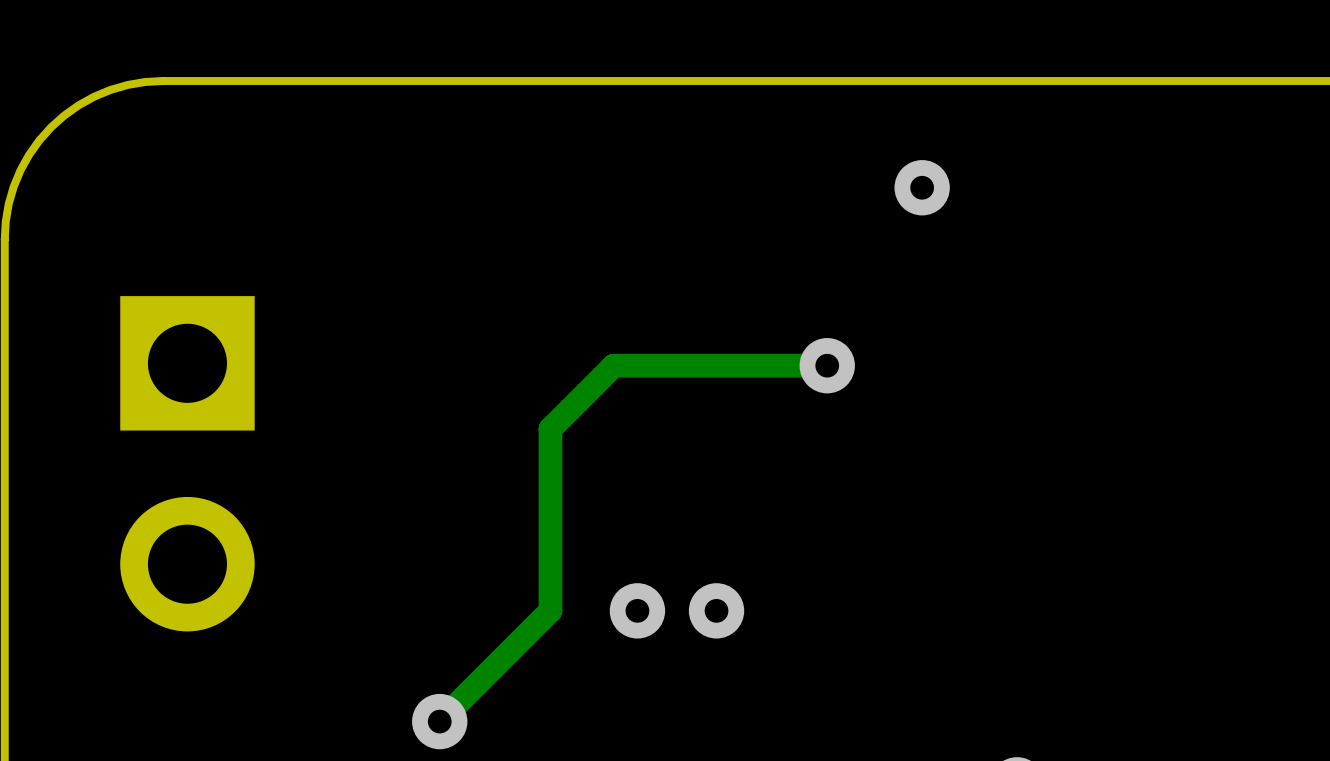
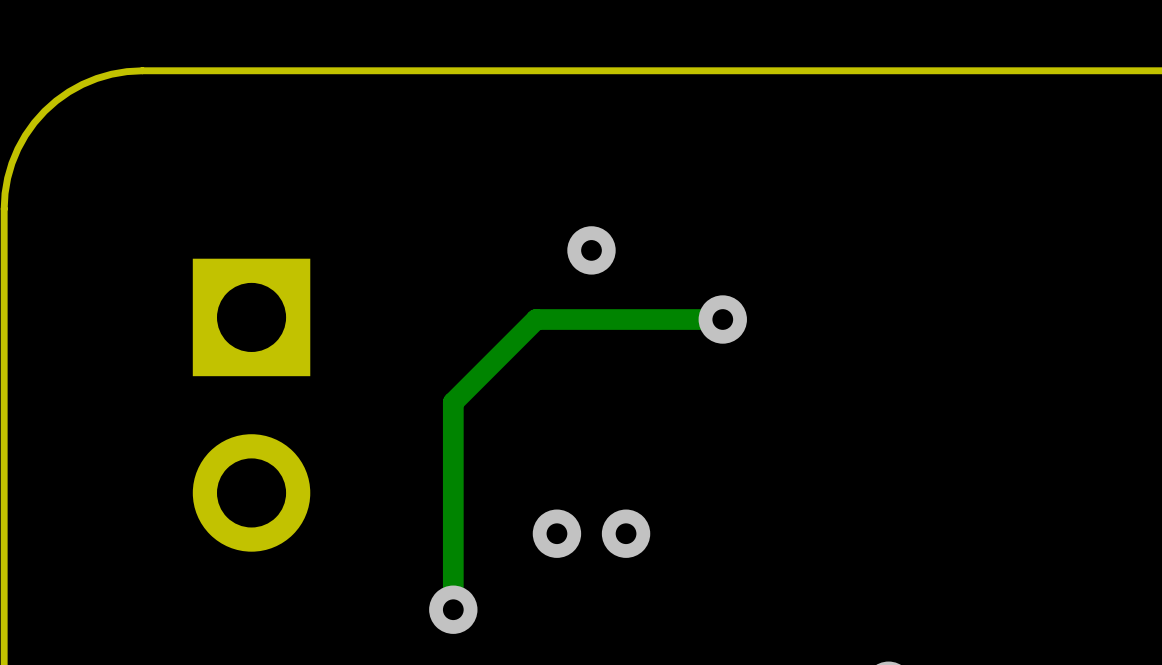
via: (922, 187) -> none
via: none -> (591, 250)
track: (550, 428) (550, 610) (439, 721) -> (480, 374) (453, 402) (453, 609)
part position: (187, 463) -> (251, 405)
via position: (439, 721) -> (453, 609)

